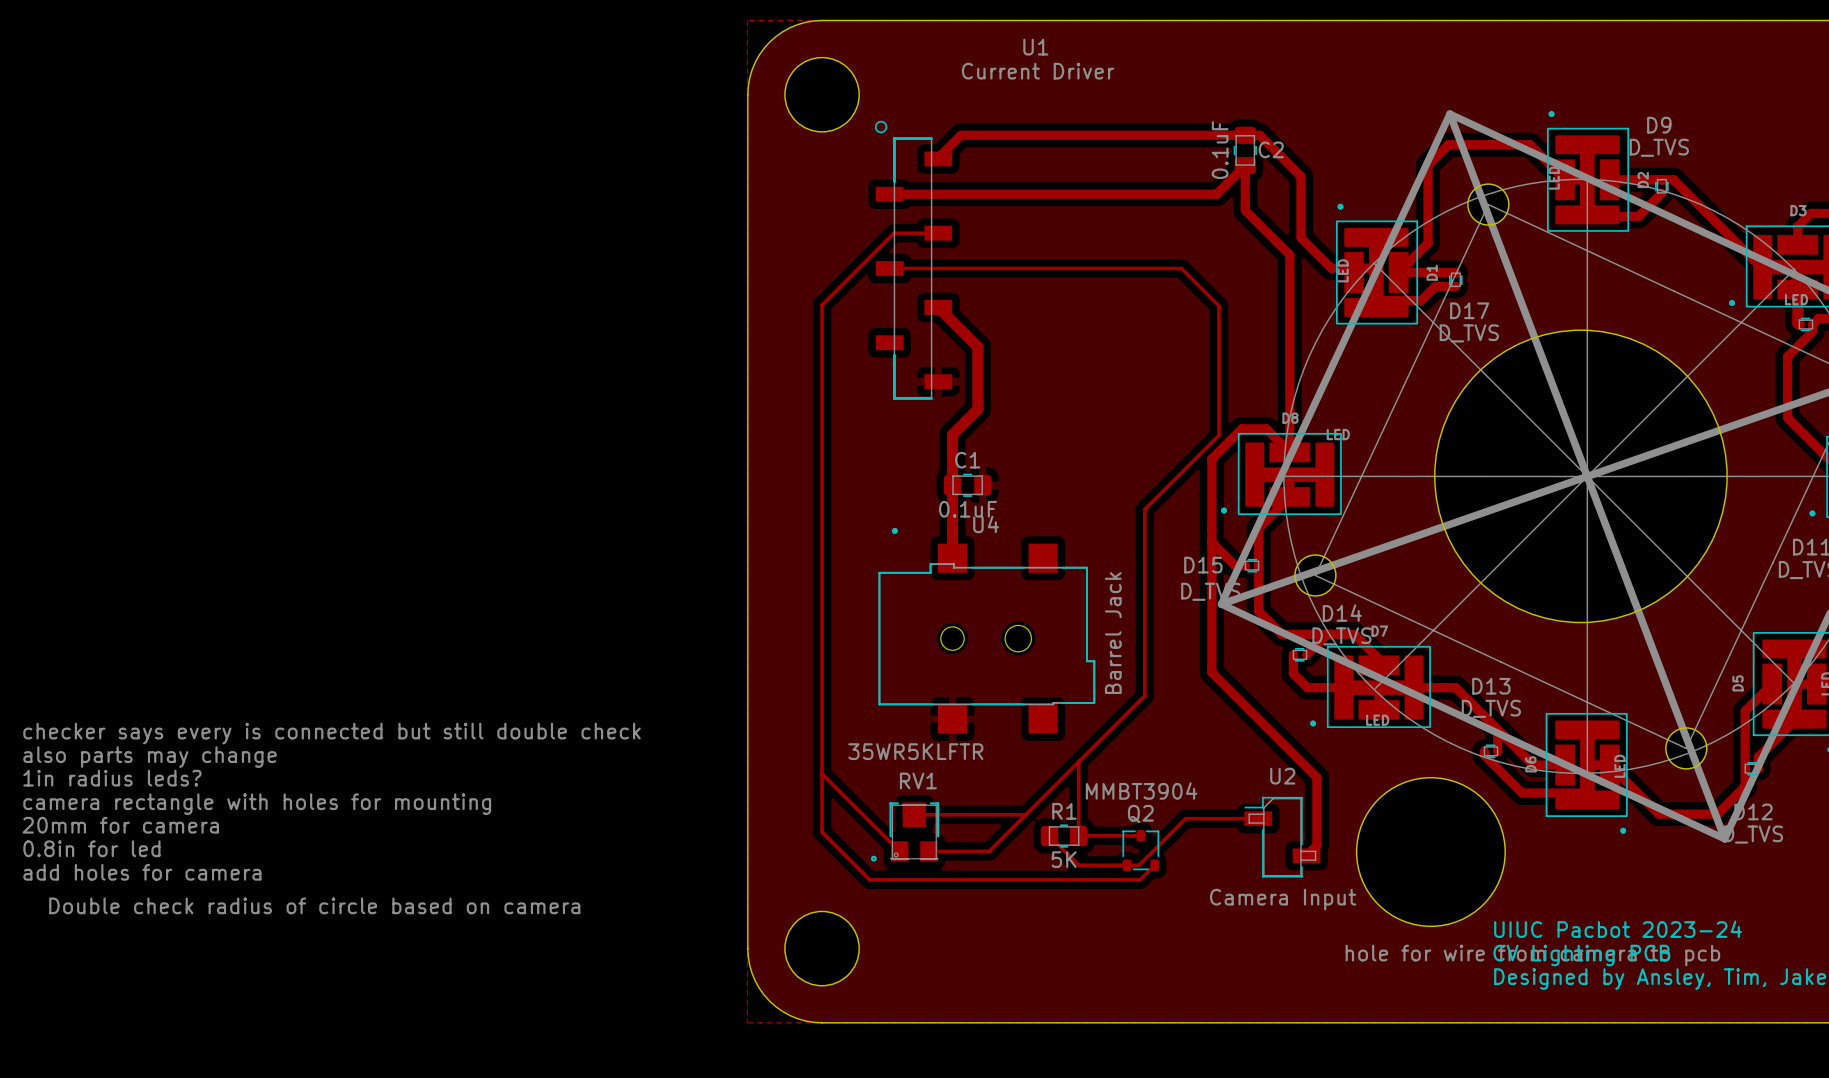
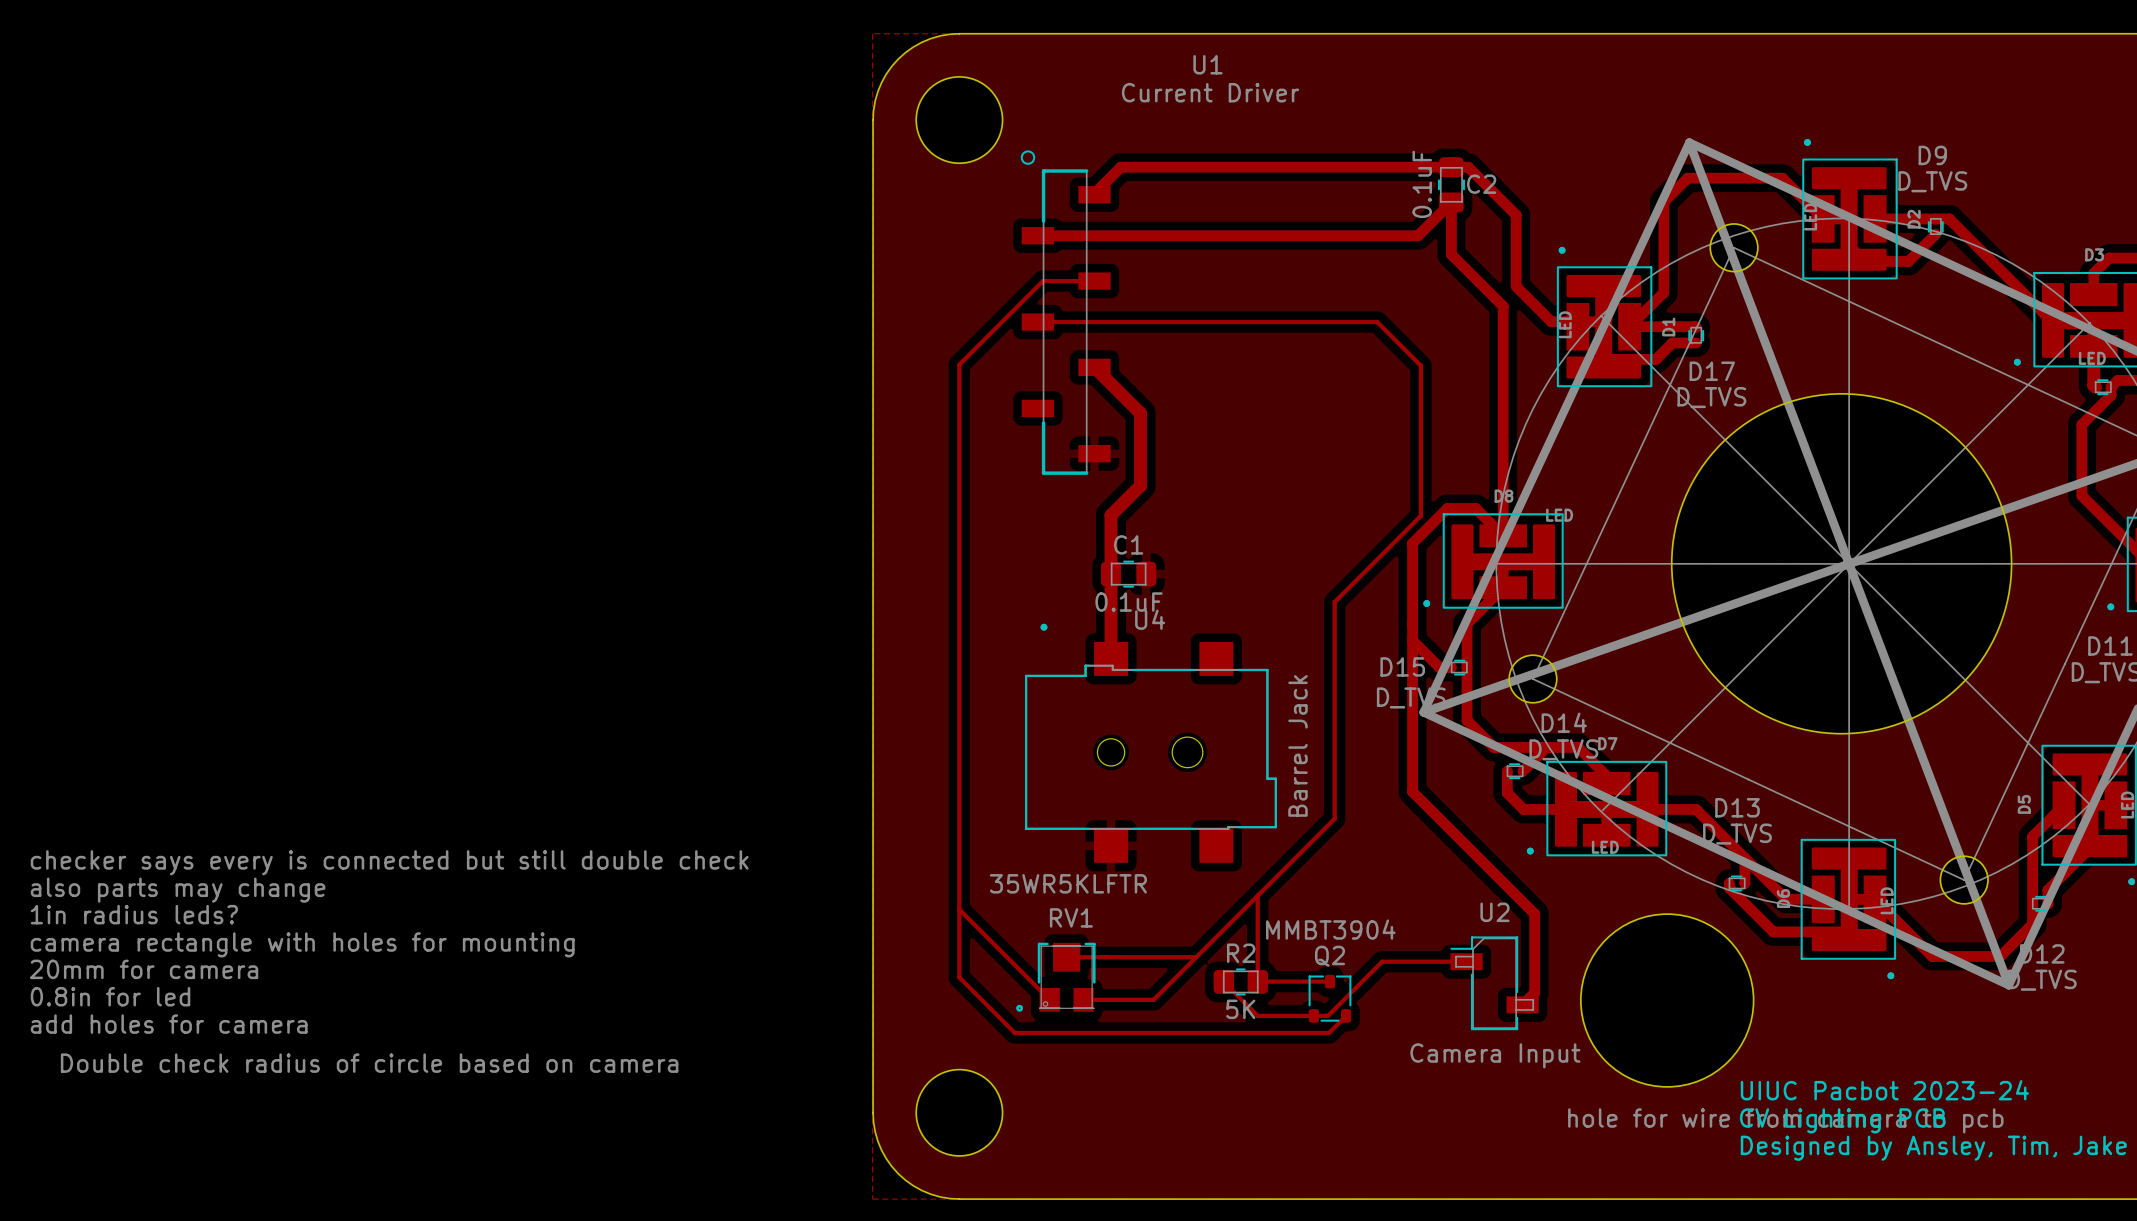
R1 name: R1 (1064, 811) -> R2 (1241, 953)

